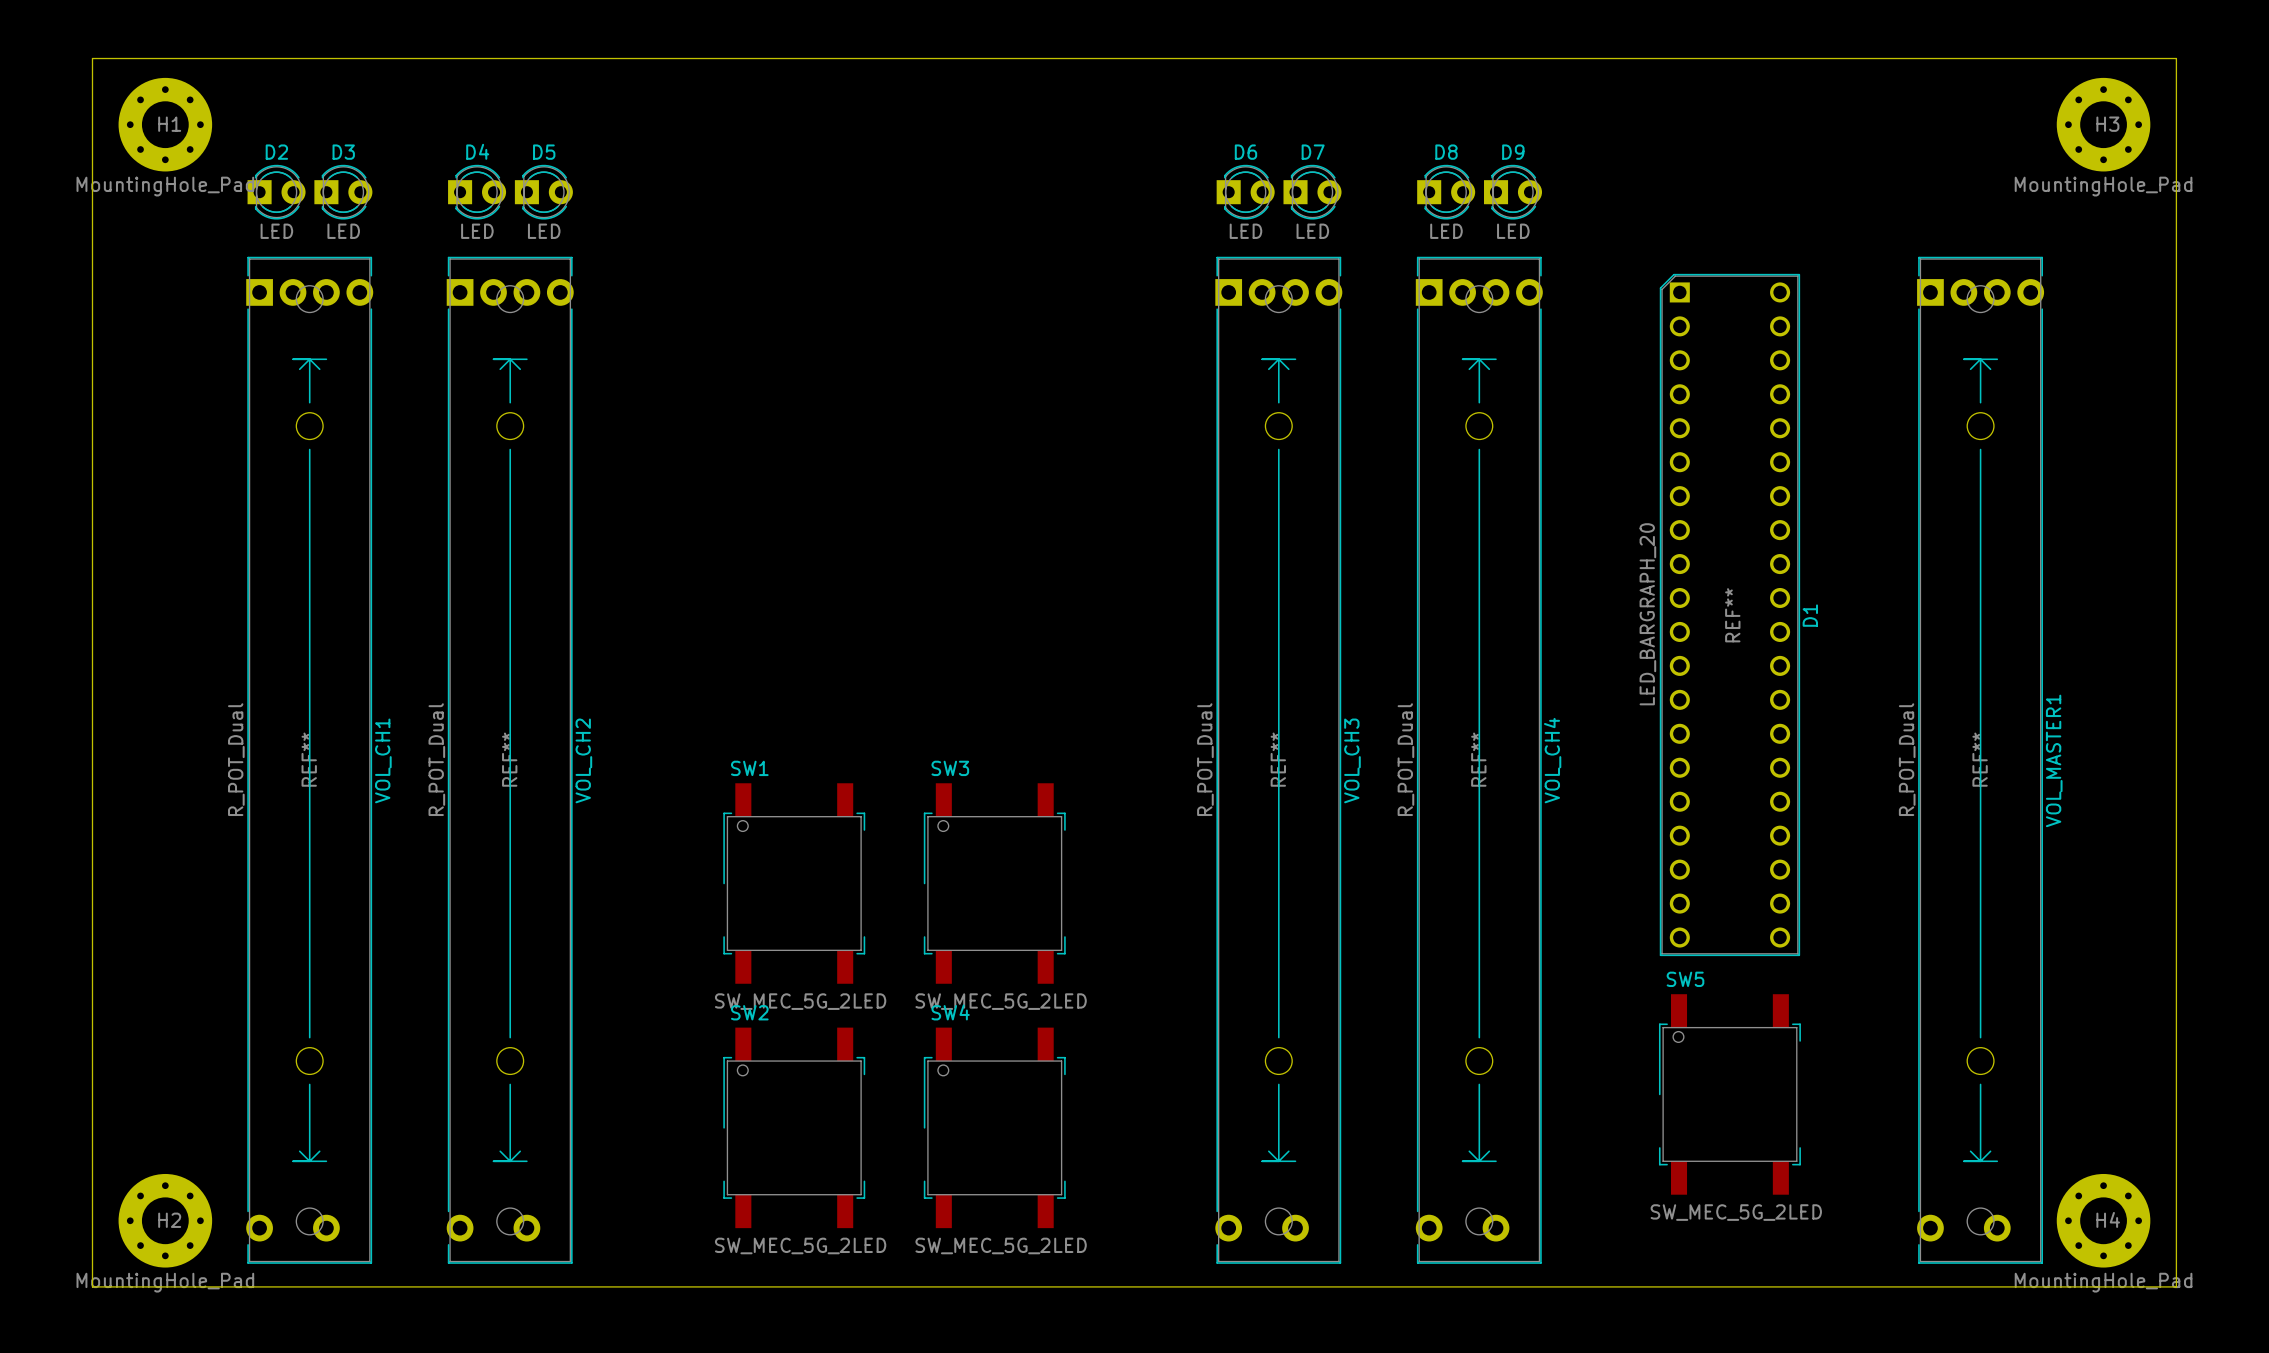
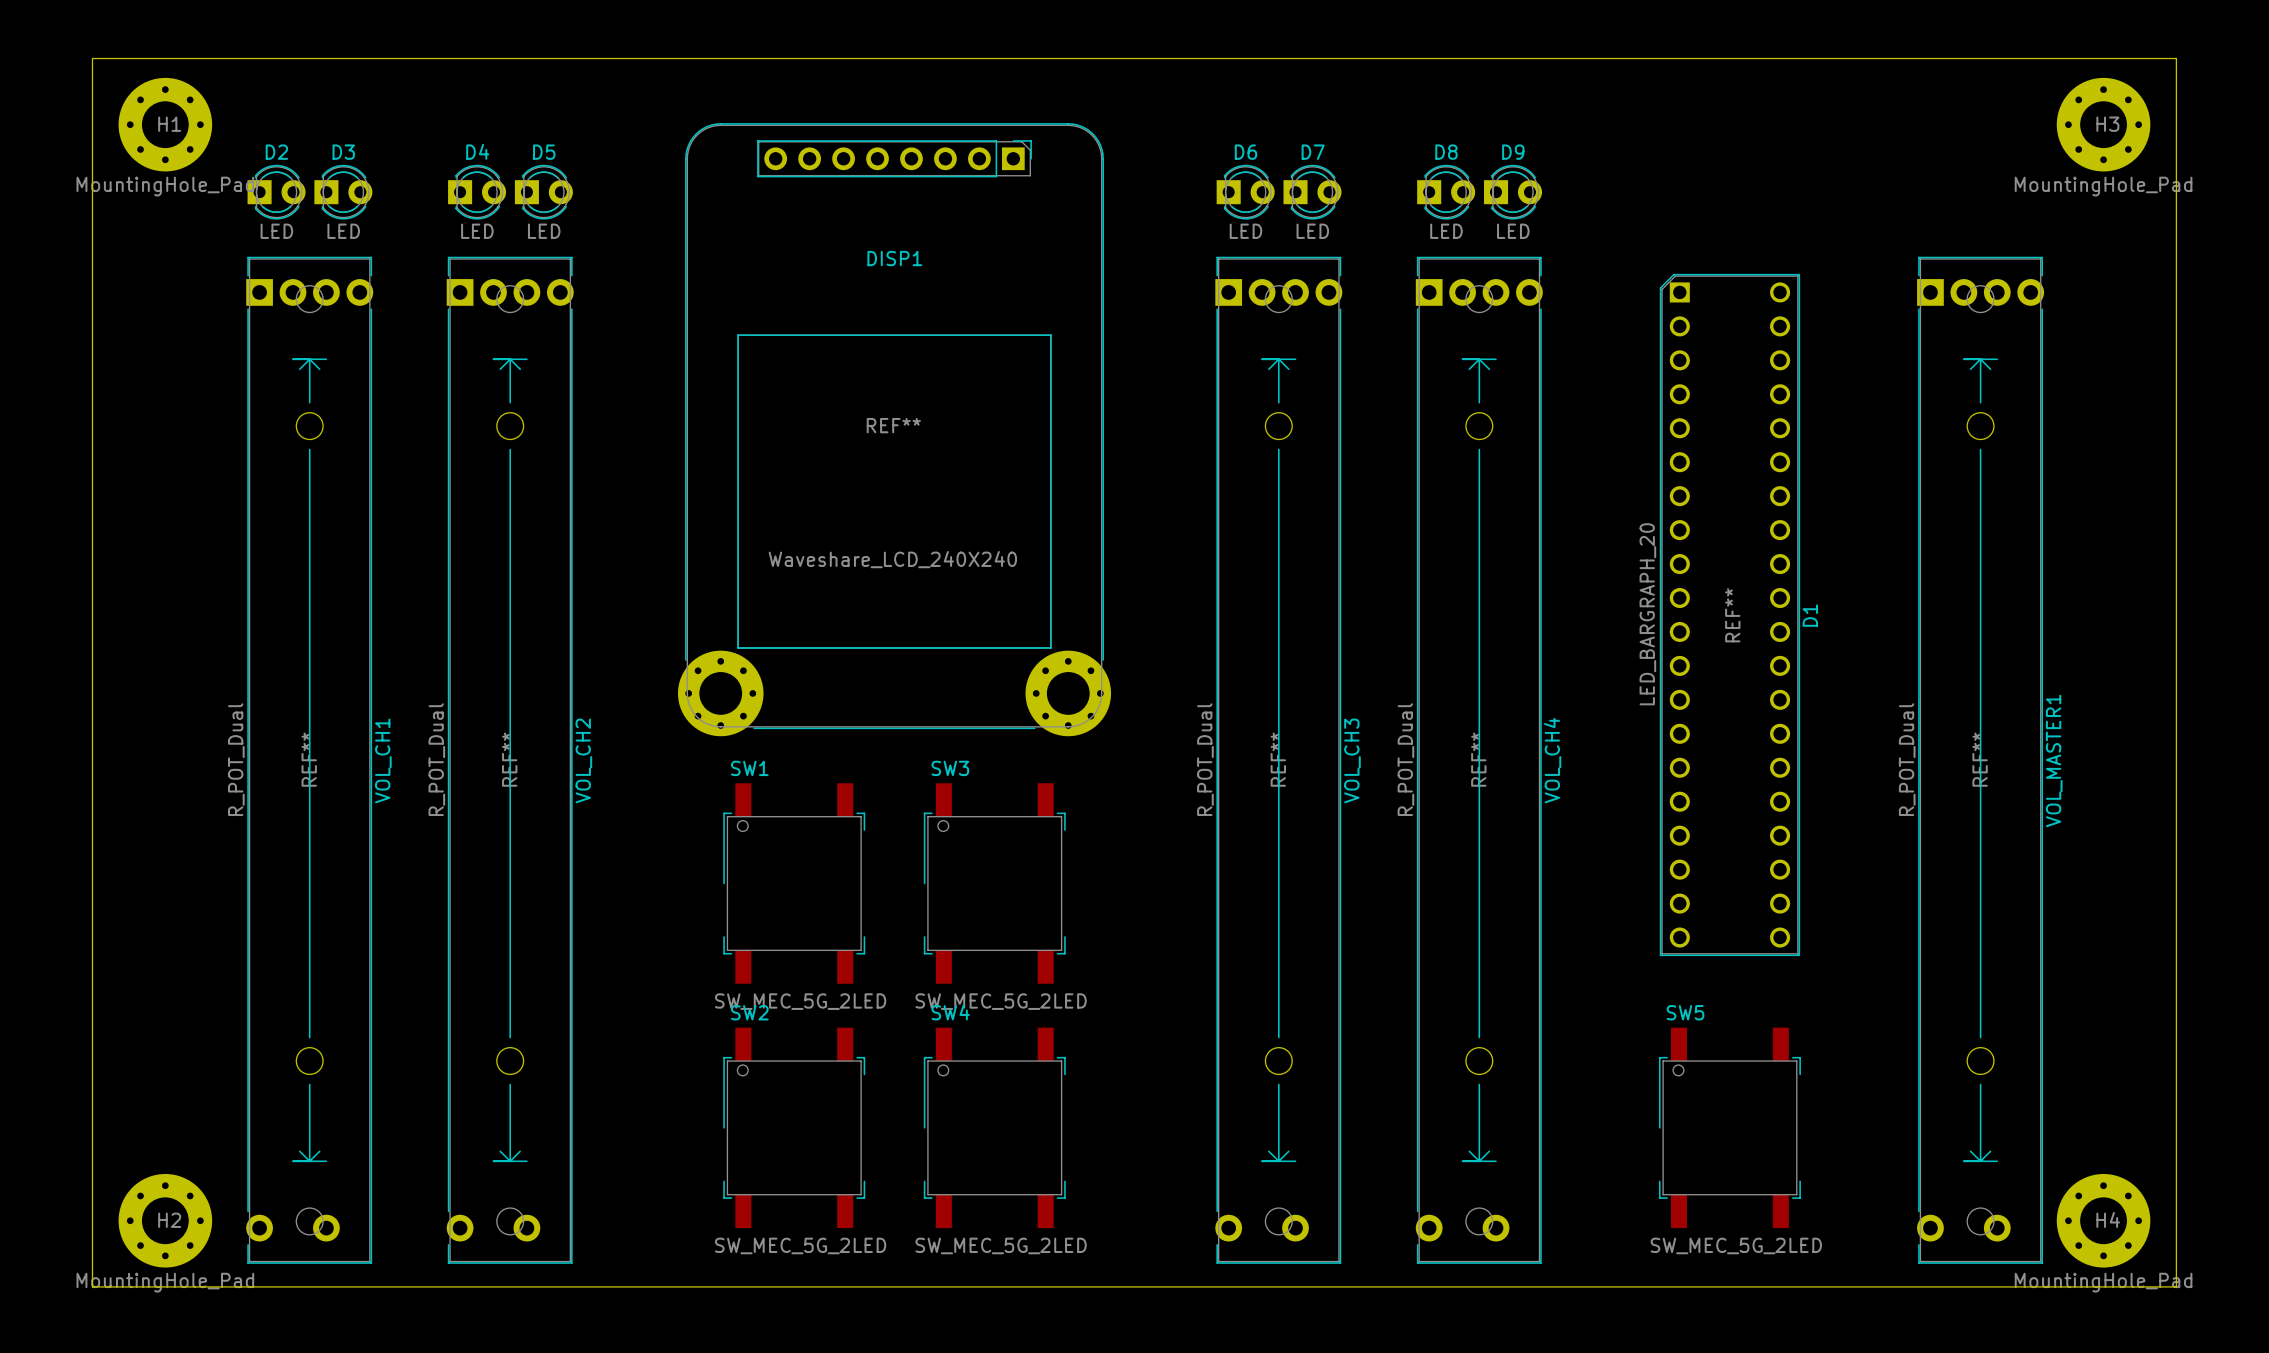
DISP1: none -> Waveshare_LCD_240X240 (894, 429)
SW5 position: (1729, 1094) -> (1729, 1127)

